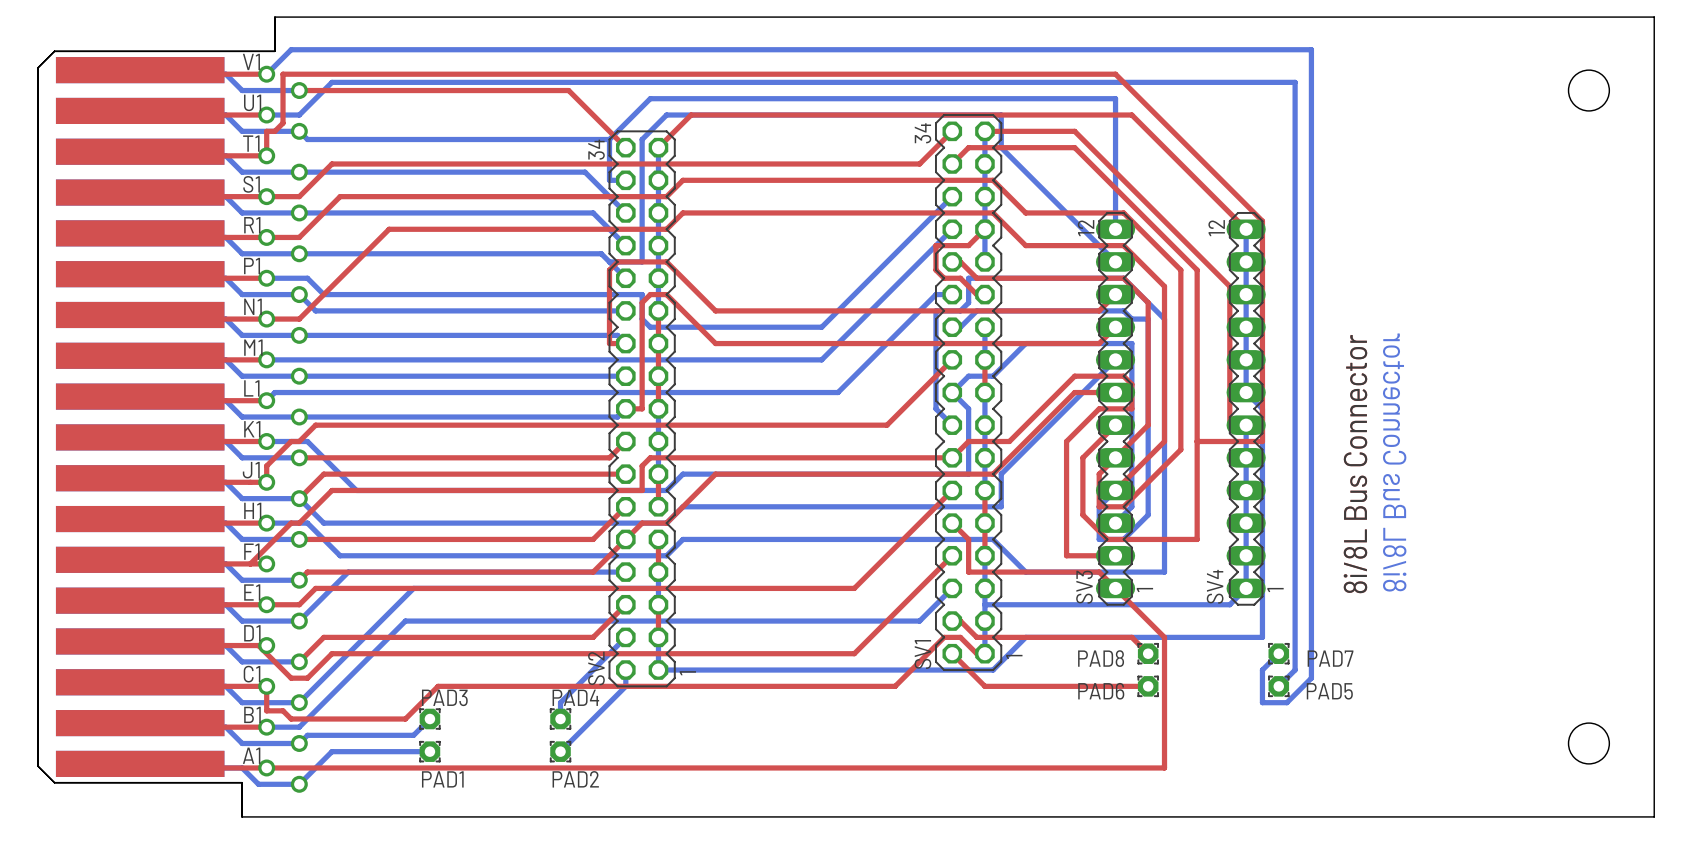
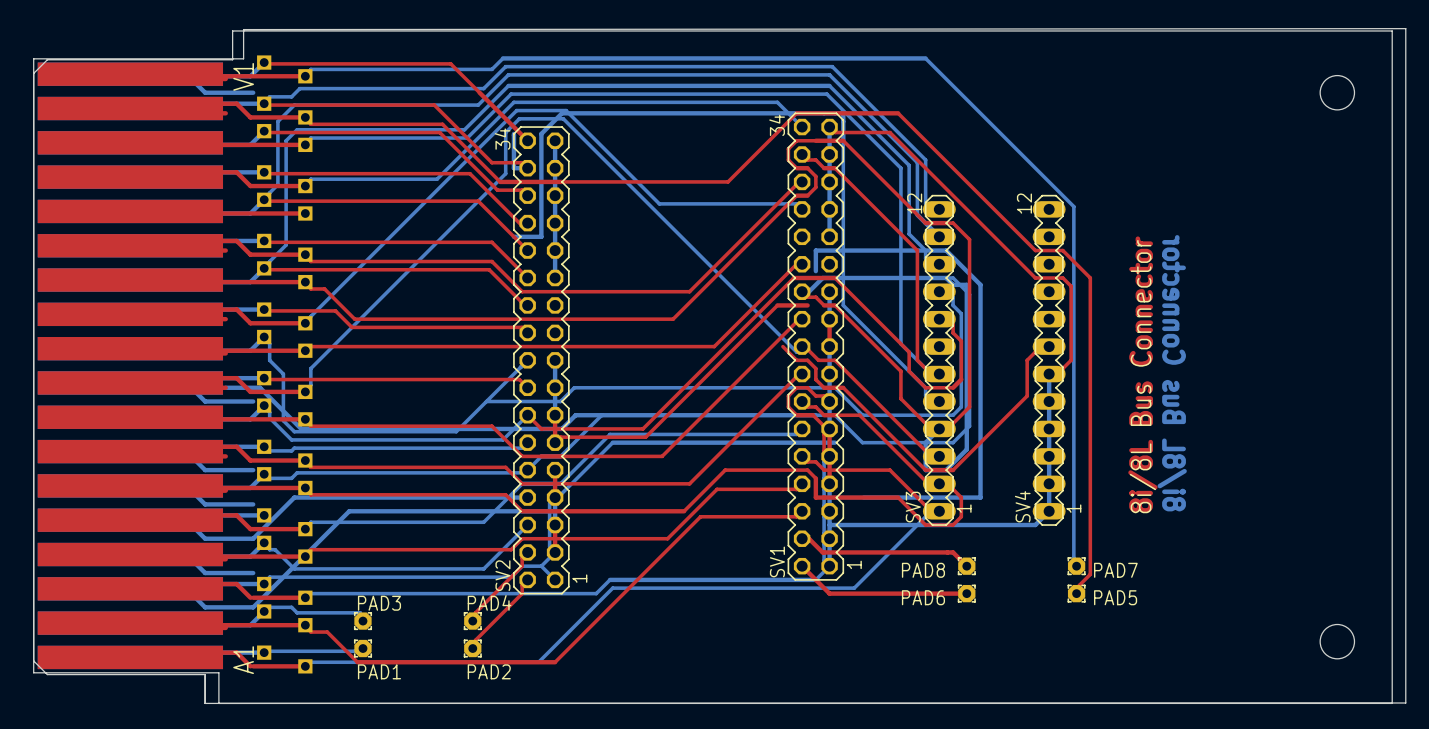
board edge: none -> (1405, 28) (1405, 703) (218, 703) (218, 672) (33, 672) (33, 58) (243, 58) (243, 29) (1405, 28)
bottom track: (596, 49) (291, 49) (266, 74) -> (502, 58) (491, 69) (310, 69) (305, 76)
bottom track: (1099, 49) (1311, 49) (1311, 678) (1286, 702) (1262, 702) (1262, 670) (1278, 653) -> (925, 58) (1073, 206) (1073, 557) (1076, 566)
text: none -> V1 (243, 76)
bottom track: (602, 82) (331, 82) (299, 115) (266, 115) -> (508, 85) (464, 129) (297, 129) (286, 140) (286, 245) (264, 268)
bottom track: (984, 82) (1295, 82) (1295, 670) (1278, 686) -> (829, 85) (909, 165) (909, 234) (925, 250) (925, 258) (939, 264)
top track: (299, 90) (568, 90) -> (264, 62) (450, 63) (479, 92)
top track: none -> (264, 103) (434, 105) (491, 162) (522, 162) (527, 168)
bottom track: (140, 110) (144, 115) (225, 115) (242, 131) (299, 131) (307, 139) (609, 139) (650, 98) (1115, 98) (1115, 229) -> (264, 103) (269, 96) (291, 96) (299, 88) (483, 88) (505, 66) (832, 66) (925, 159) (925, 203) (939, 209)
top track: (945, 115) (691, 115) (658, 147) -> (796, 113) (728, 181) (561, 181)
top track: (1066, 115) (1131, 115) (1246, 229) -> (898, 113) (1035, 250) (1062, 250) (1090, 277) (1090, 574) (1079, 585) (1076, 593)
top track: (952, 131) (919, 163) (331, 163) (299, 196) (144, 196) (140, 192) -> none
bottom track: none -> (802, 127) (777, 102) (513, 102) (437, 179) (310, 179) (305, 186)
top track: (984, 131) (1074, 131) (1229, 286) (1229, 425) (1246, 425) -> (829, 127) (835, 132) (889, 132) (1035, 277) (1062, 277) (1071, 286) (1071, 360) (1062, 368) (1049, 374)
top track: none -> (264, 131) (439, 132) (497, 190) (522, 190) (527, 195)
top track: (968, 147) (952, 163) -> (815, 140) (796, 140) (788, 149) (788, 159) (796, 168)
top track: (1001, 147) (1074, 147) (1197, 270) (1197, 539) (1131, 539) -> (1049, 346) (1035, 352) (1027, 360) (1027, 396) (953, 470)
bottom track: (1001, 147) (1089, 235) -> (843, 140) (843, 305) (925, 387) (925, 396) (939, 401)
top track: (140, 151) (144, 155) (266, 155) (266, 131) (274, 131) (283, 123) (283, 74) (1115, 74) (1262, 221) (1262, 441) (1197, 441) -> none
bottom track: (140, 151) (144, 155) (225, 155) (242, 172) (585, 172) (625, 212) -> none
bottom track: none -> (305, 144) (310, 138) (467, 138) (511, 94) (826, 94) (900, 168) (900, 343) (925, 368) (939, 374)
top track: (945, 180) (682, 180) (666, 196) -> none
top track: (958, 180) (978, 180) -> (802, 154) (807, 159) (815, 159) (824, 168)
top track: none -> (807, 168) (815, 176) (815, 187) (807, 195)
top track: (991, 180) (1025, 212) (1123, 212) (1180, 270) (1180, 449) (1123, 506) (1099, 506) (1099, 474) (1131, 441) -> (835, 168) (917, 250) (917, 360) (925, 368) (939, 374)
top track: none -> (264, 172) (470, 173) (522, 225) (527, 223)
bottom track: (140, 192) (144, 196) (225, 196) (242, 212) (593, 212) (625, 245) -> none
top track: (593, 196) (340, 196) (299, 237) (144, 237) (140, 233) -> (500, 181) (442, 124) (310, 124) (305, 117)
top track: none -> (802, 181) (796, 184) (689, 291) (522, 291) (491, 261) (310, 261) (305, 254)
bottom track: (952, 196) (821, 327) (650, 327) (642, 319) (642, 294) (323, 294) (307, 278) (266, 278) -> none
top track: (945, 212) (682, 212) (666, 229) (389, 229) (299, 319) (144, 319) (140, 314) -> (796, 195) (673, 319) (354, 319) (324, 288) (310, 288) (305, 282)
top track: (958, 212) (993, 212) (1025, 245) (1099, 245) -> (843, 140) (925, 223)
top track: none -> (264, 199) (478, 201) (527, 250)
bottom track: none -> (264, 199) (277, 184) (277, 121) (294, 105) (478, 105) (508, 74) (829, 74) (917, 162) (917, 214)
bottom track: (952, 229) (821, 359) (266, 359) -> (802, 209) (796, 203) (659, 203) (566, 110) (516, 110) (305, 323)
top track: (984, 229) (968, 245) (935, 245) (935, 270) (944, 278) (960, 278) (976, 294) (984, 294) -> none
bottom track: (1246, 229) (1246, 392) (1262, 408) (1262, 637) (1025, 637) (993, 670) (968, 670) -> (829, 456) (824, 461) (824, 478) (829, 483) (824, 489) (824, 505) (829, 511) (824, 516) (824, 533) (829, 538) (824, 544) (824, 560) (829, 566) (815, 579)
bottom track: (140, 233) (144, 237) (225, 237) (242, 253) (601, 253) (625, 278) -> none
top track: (1123, 245) (1164, 286) (1164, 441) (1115, 490) -> none
top track: (952, 261) (960, 261) (976, 278) (1123, 278) (1148, 302) (1148, 425) (1141, 431) -> (939, 319) (953, 324) (953, 332) (961, 341) (961, 379)
top track: none -> (264, 240) (491, 242) (527, 277)
bottom track: (140, 274) (144, 278) (225, 278) (242, 294) (299, 294) (315, 310) (625, 310) -> none
top track: none -> (802, 264) (796, 264) (714, 346) (310, 346) (305, 350)
bottom track: (952, 294) (935, 294) (838, 392) (274, 392) (266, 400) -> none
top track: (1115, 294) (1099, 310) (991, 310) -> (953, 387) (925, 387) (909, 371) (909, 352) (835, 277)
top track: none -> (264, 268) (489, 269) (522, 302) (527, 305)
bottom track: (968, 302) (960, 310) (935, 310) (935, 408) (952, 425) -> none
top track: (658, 310) (658, 408) -> none
top track: (942, 310) (715, 310) (666, 261) (617, 261) (609, 270) (609, 343) (625, 343) -> (793, 277) (642, 428) (541, 428) (527, 415)
bottom track: (140, 314) (144, 319) (225, 319) (242, 335) (617, 335) (625, 343) -> none
top track: (1115, 327) (1099, 343) (991, 343) -> (946, 223) (953, 223) (969, 239) (969, 406) (953, 423) (939, 428) (925, 423) (900, 398) (900, 371) (835, 305)
bottom track: none -> (939, 291) (953, 297) (953, 305) (961, 313) (961, 406) (953, 415) (862, 415) (835, 387) (574, 387) (560, 401) (486, 401)
top track: (922, 343) (715, 343) (666, 294) (650, 294) (642, 302) (642, 408) (625, 408) -> (777, 305) (645, 437) (560, 437) (555, 442)
top track: (958, 343) (978, 343) -> (802, 291) (807, 297) (815, 297) (824, 305)
top track: none -> (264, 309) (335, 310) (352, 327) (522, 327) (527, 332)
bottom track: (140, 355) (144, 359) (225, 359) (242, 376) (625, 376) -> none
top track: (952, 359) (887, 425) (315, 425) (299, 441) (291, 441) (266, 465) (266, 482) (144, 482) (140, 478) -> none
bottom track: (1115, 359) (1001, 474) (1001, 506) (991, 506) -> none
top track: none -> (802, 346) (818, 360) (835, 360) (925, 450) (939, 456)
bottom track: none -> (802, 346) (796, 352) (563, 118) (519, 118) (505, 132) (505, 173) (310, 368) (310, 385) (305, 391)
top track: (1115, 392) (1074, 392) (993, 474) -> (898, 497) (925, 525) (953, 525) (961, 516) (961, 497) (953, 489) (925, 481) (859, 415) (836, 415)
bottom track: (140, 396) (144, 400) (225, 400) (242, 417) (617, 417) -> (264, 337) (269, 343) (269, 360) (283, 374) (283, 420) (294, 431) (456, 431) (520, 367)
part: none -> (175, 364)
part: (156, 417) -> none
top track: none -> (802, 374) (796, 376) (689, 483) (522, 483) (505, 467) (310, 467) (305, 460)
top track: (1115, 425) (1082, 457) (1082, 514) (1107, 539) -> none
part: (283, 429) -> none
top track: (625, 441) (609, 457) (299, 457) -> (527, 387) (519, 379) (264, 378)
top track: (978, 441) (968, 441) (952, 457) (650, 457) (642, 465) (642, 490) (331, 490) (299, 523) (291, 523) (250, 563) -> (824, 387) (815, 379) (815, 368) (807, 360) (796, 360) (782, 346)
top track: (1001, 441) (1009, 441) (1074, 376) (1123, 376) (1131, 384) (1131, 408) (1099, 408) (1066, 441) (1066, 555) (1115, 555) -> (843, 387) (925, 470) (932, 470)
top track: none -> (829, 401) (824, 396) (815, 396) (807, 387) (796, 387) (788, 396) (788, 406) (796, 415)
bottom track: none -> (264, 405) (269, 412) (269, 417) (291, 439) (502, 439) (527, 415)
top track: (625, 474) (323, 474) (299, 498) -> none
top track: (945, 474) (715, 474) (666, 523) -> (802, 319) (796, 321) (662, 456) (561, 456)
top track: (965, 474) (978, 474) -> (802, 401) (807, 406) (815, 406) (824, 415)
top track: none -> (813, 415) (829, 428) (824, 434) (824, 450) (829, 456)
bottom track: (968, 474) (968, 408) (952, 392) (968, 376) (993, 376) (1025, 343) (1131, 343) (1131, 506) (1115, 523) -> (815, 415) (835, 415) (862, 442) (953, 442) (969, 426) (969, 294) (953, 277) (946, 277)
bottom track: (140, 478) (144, 482) (225, 482) (242, 498) (299, 498) (323, 523) (642, 523) -> (264, 474) (269, 478) (291, 478) (297, 472) (522, 472) (541, 456)
top track: (952, 490) (854, 588) (811, 588) -> (815, 478) (807, 470) (725, 470) (684, 511)
top track: (625, 506) (593, 539) (299, 539) -> none
bottom track: none -> (527, 442) (522, 448) (294, 448) (291, 450) (269, 450) (264, 446)
bottom track: (727, 506) (682, 506) (665, 523) -> (601, 415) (560, 456)
bottom track: none -> (612, 442) (560, 494) (549, 503) (549, 519) (555, 525) (549, 530) (549, 546) (555, 552) (541, 566)
bottom track: (266, 523) (307, 523) (340, 555) (619, 555) -> (305, 529) (310, 522) (483, 522) (522, 483)
top track: (642, 523) (593, 572) (307, 572) (299, 580) -> (541, 456) (522, 456) (491, 426) (310, 426) (305, 419)
top track: (958, 529) (968, 539) (968, 549) -> (807, 461) (815, 461) (824, 470) (889, 470) (925, 505) (939, 511)
bottom track: (665, 555) (682, 539) (993, 539) (1025, 572) -> (560, 483) (610, 434) (796, 434) (802, 428)
top track: (945, 562) (854, 653) (331, 653) (307, 678) (291, 678) (258, 645) -> (796, 489) (717, 489) (667, 538) (522, 538) (511, 549) (310, 549) (305, 556)
top track: (1066, 572) (1099, 572) (1164, 637) (1164, 767) (658, 767) -> (802, 511) (796, 516) (700, 516) (555, 662)
top track: (619, 588) (315, 588) (299, 604) (144, 604) (140, 600) -> (522, 511) (505, 494) (310, 494) (305, 487)
bottom track: (952, 588) (919, 621) (405, 621) (299, 727) (266, 727) -> none
bottom track: none -> (939, 511) (925, 516) (854, 588) (612, 588) (538, 662) (310, 662) (305, 666)
top track: (625, 604) (593, 637) (323, 637) (299, 661) -> none
bottom track: none -> (527, 525) (483, 568) (294, 568) (275, 549) (269, 549) (264, 542)
top track: none -> (527, 552) (522, 557) (522, 566) (475, 612) (472, 621)
bottom track: (625, 637) (560, 702) (560, 719) -> none
bottom track: (658, 637) (658, 670) (723, 670) -> (305, 597) (310, 593) (596, 593) (610, 579)
bottom track: none -> (541, 566) (522, 566) (511, 577) (269, 577) (264, 584)
bottom track: none -> (541, 566) (555, 579)
top track: (984, 653) (976, 653) (960, 637) (944, 637) (895, 686) (438, 686) (405, 719) (291, 719) (283, 710) (266, 710) (266, 686) (144, 686) (140, 682) -> none
top track: none -> (527, 579) (522, 585) (522, 593) (475, 640) (472, 648)
bottom track: (625, 670) (625, 686) (560, 751) -> none
bottom track: (429, 719) (413, 735) (307, 735) (299, 743) (242, 743) (225, 727) (144, 727) (140, 723) -> (362, 621) (360, 612) (297, 612) (291, 607) (269, 607) (264, 611)
bottom track: (429, 751) (331, 751) (299, 784) (258, 784) (242, 767) (144, 767) (140, 763) -> (362, 648) (354, 651) (264, 652)
top track: (140, 763) (144, 767) (423, 767) -> (305, 625) (310, 632) (327, 632) (357, 662)
text: none -> A1 (243, 660)

